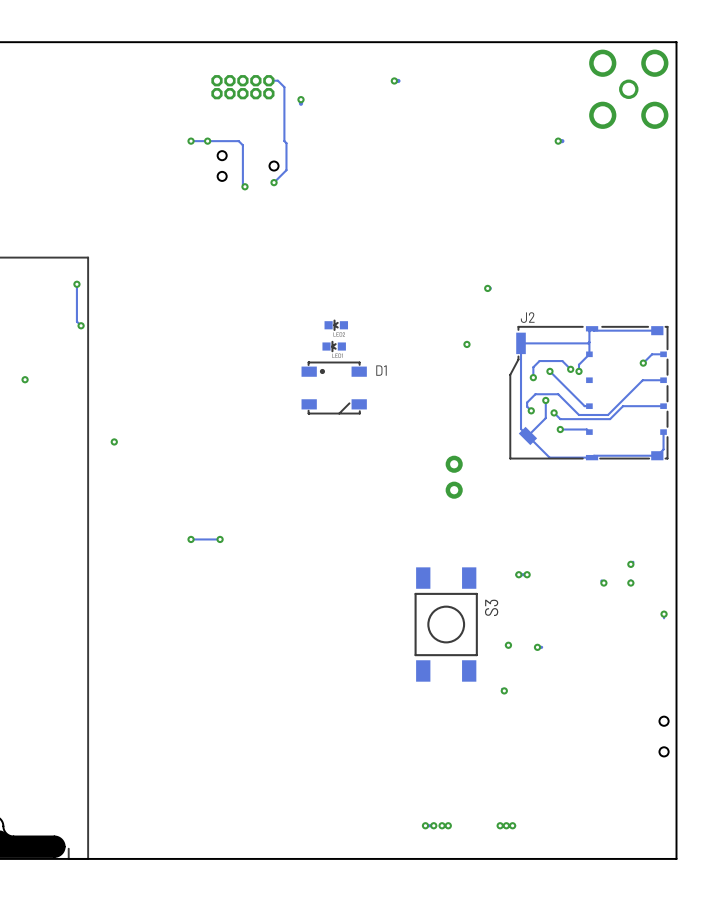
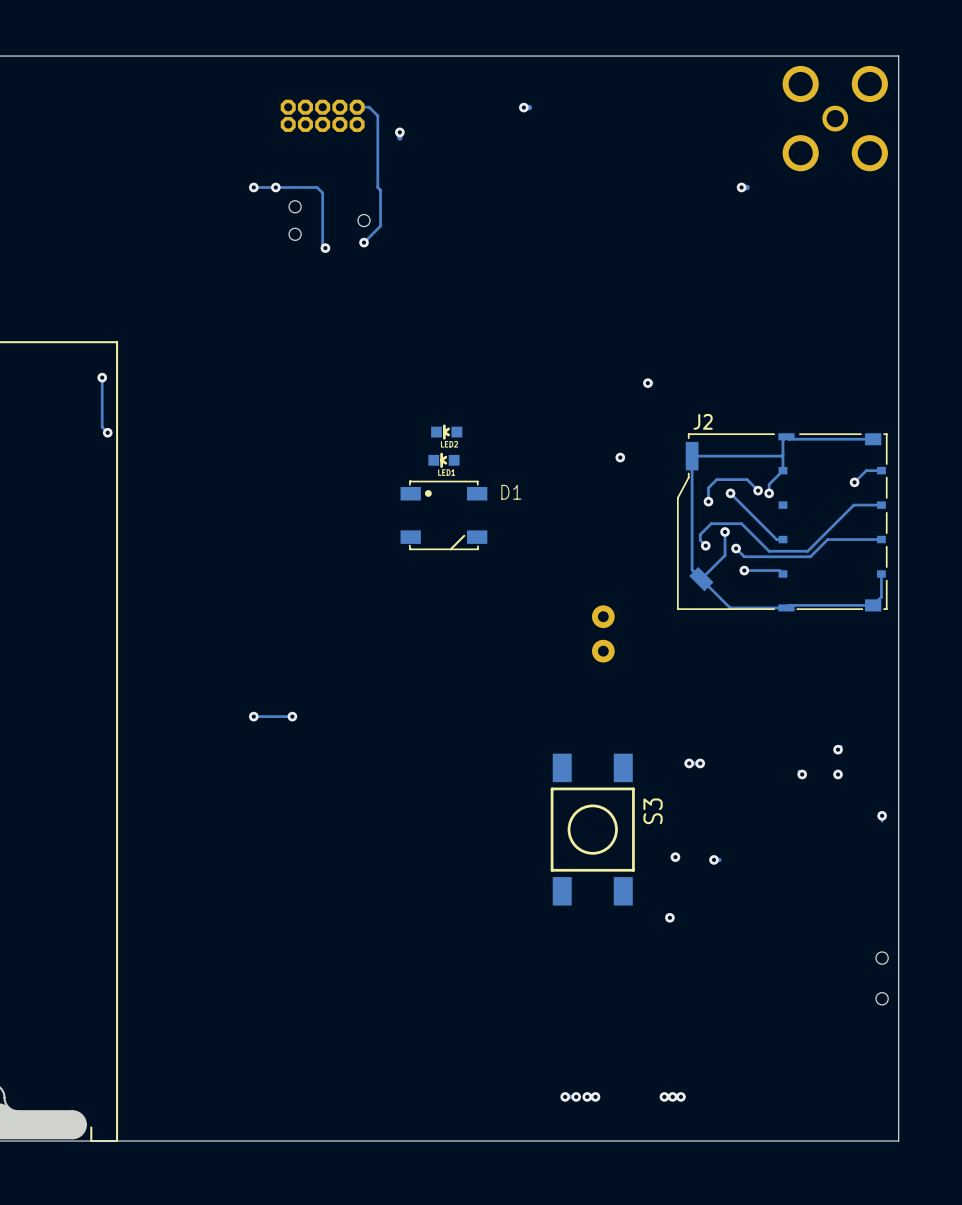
via: (25, 379) -> none
via: (114, 441) -> none

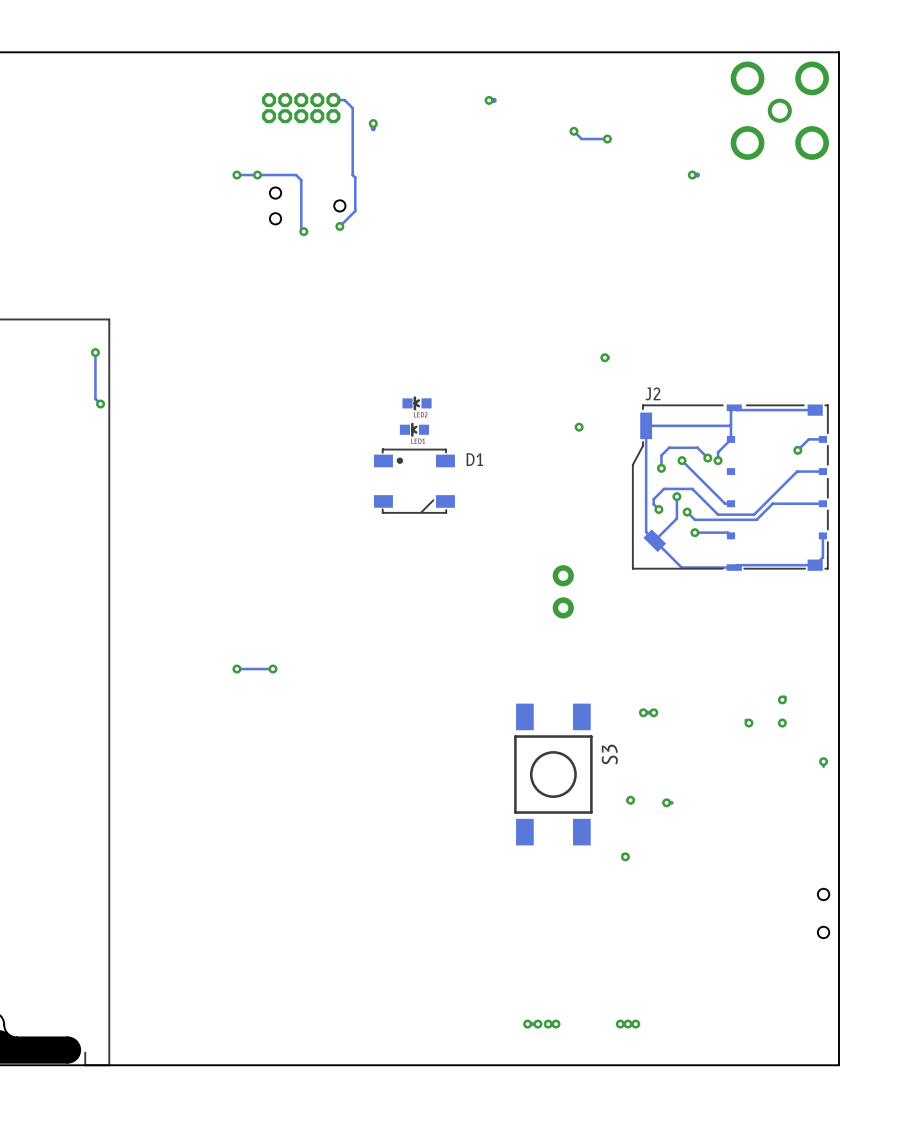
track: none -> (573, 131) (581, 139) (607, 139)
via: none -> (573, 131)
via: none -> (607, 139)

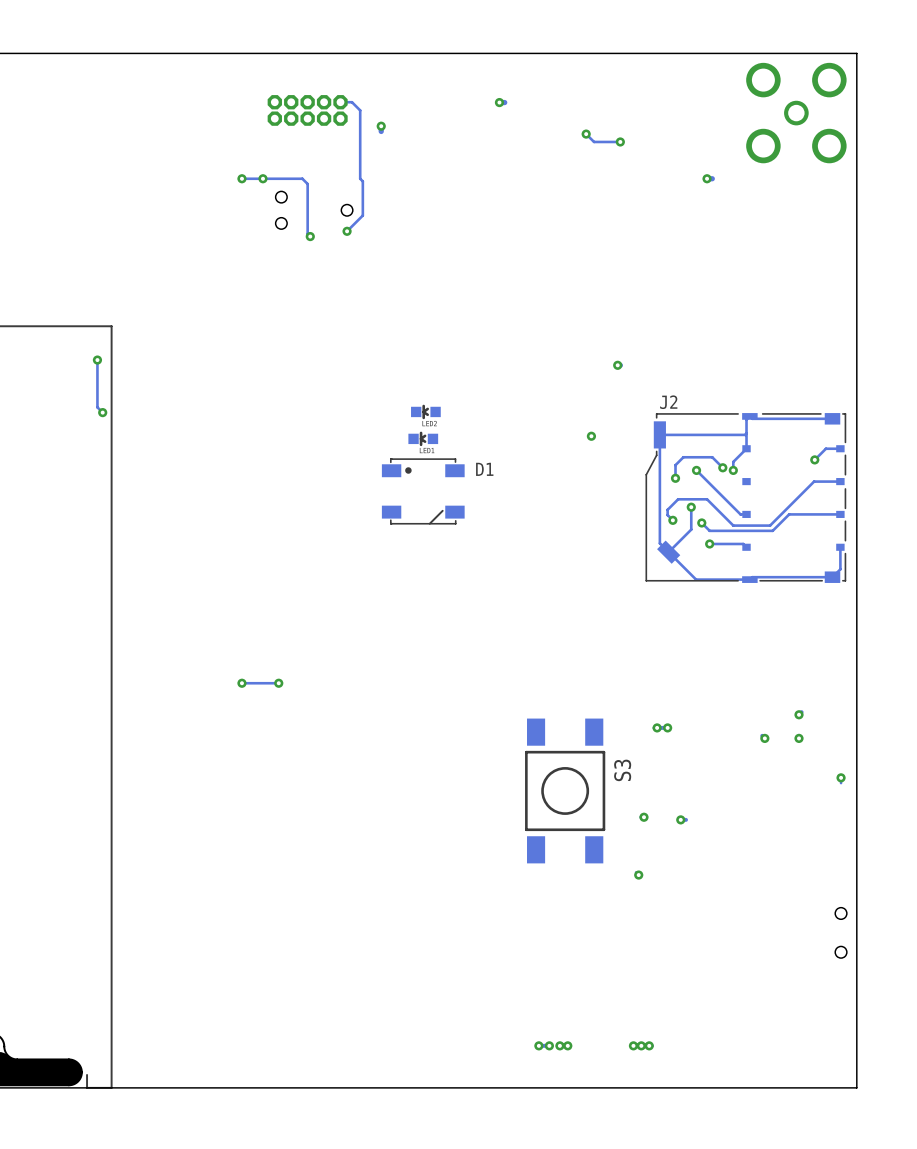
part: (563, 591) -> none

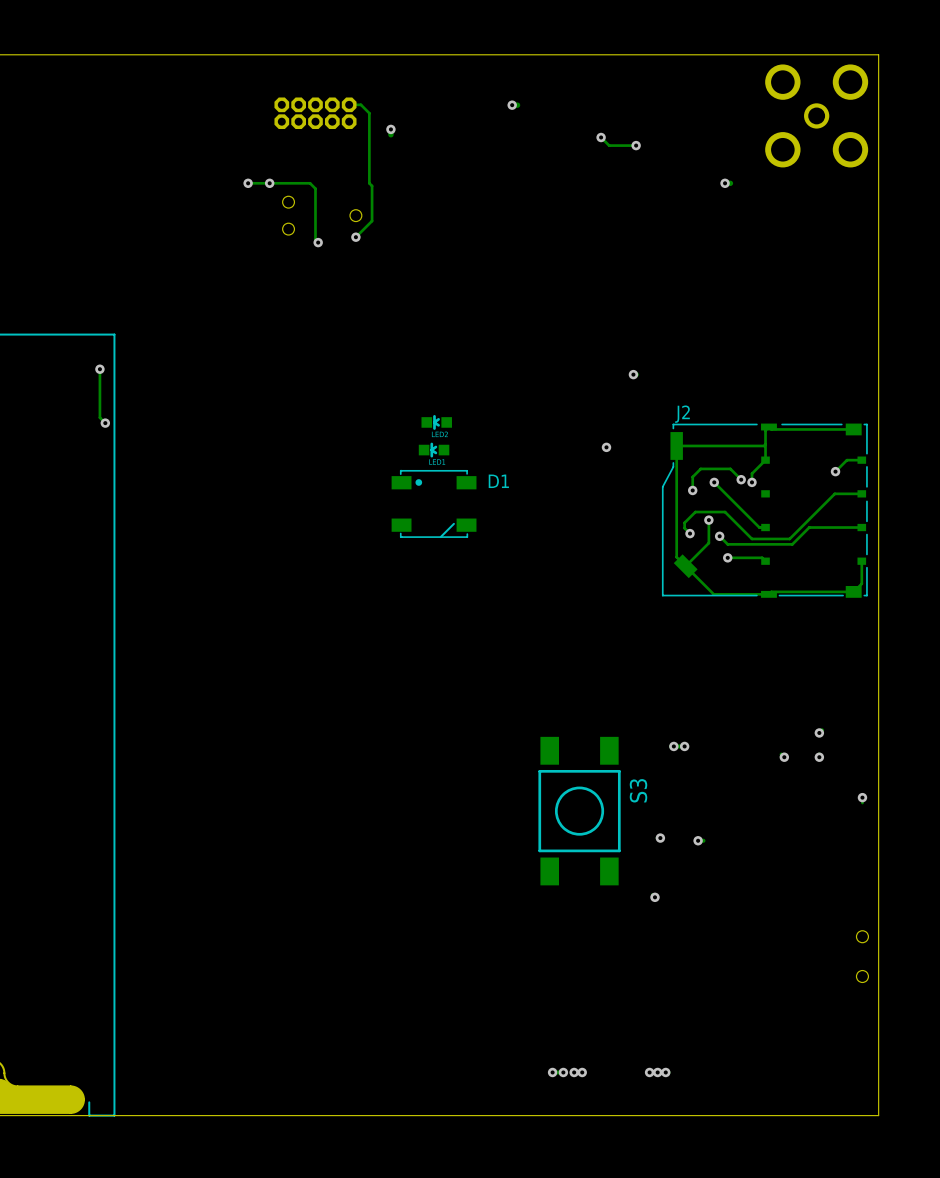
via: (241, 683) -> none
track: (278, 683) (241, 683) -> none
via: (278, 683) -> none

